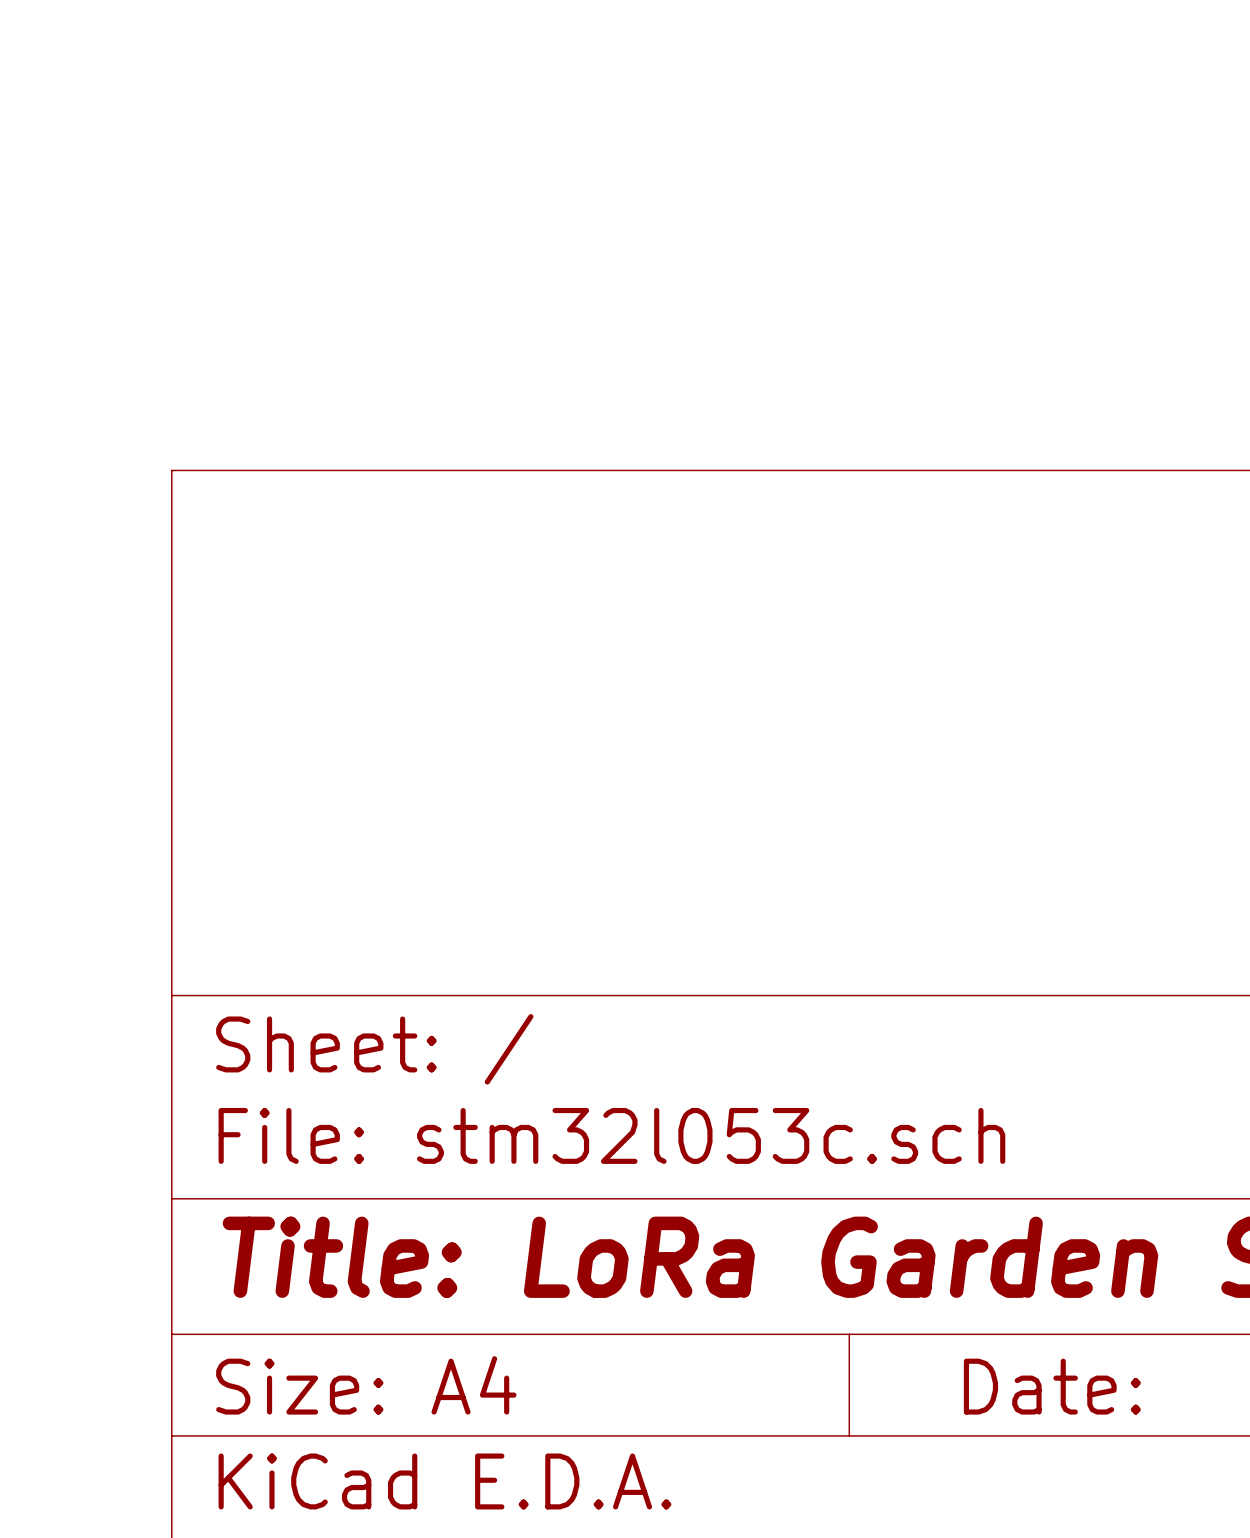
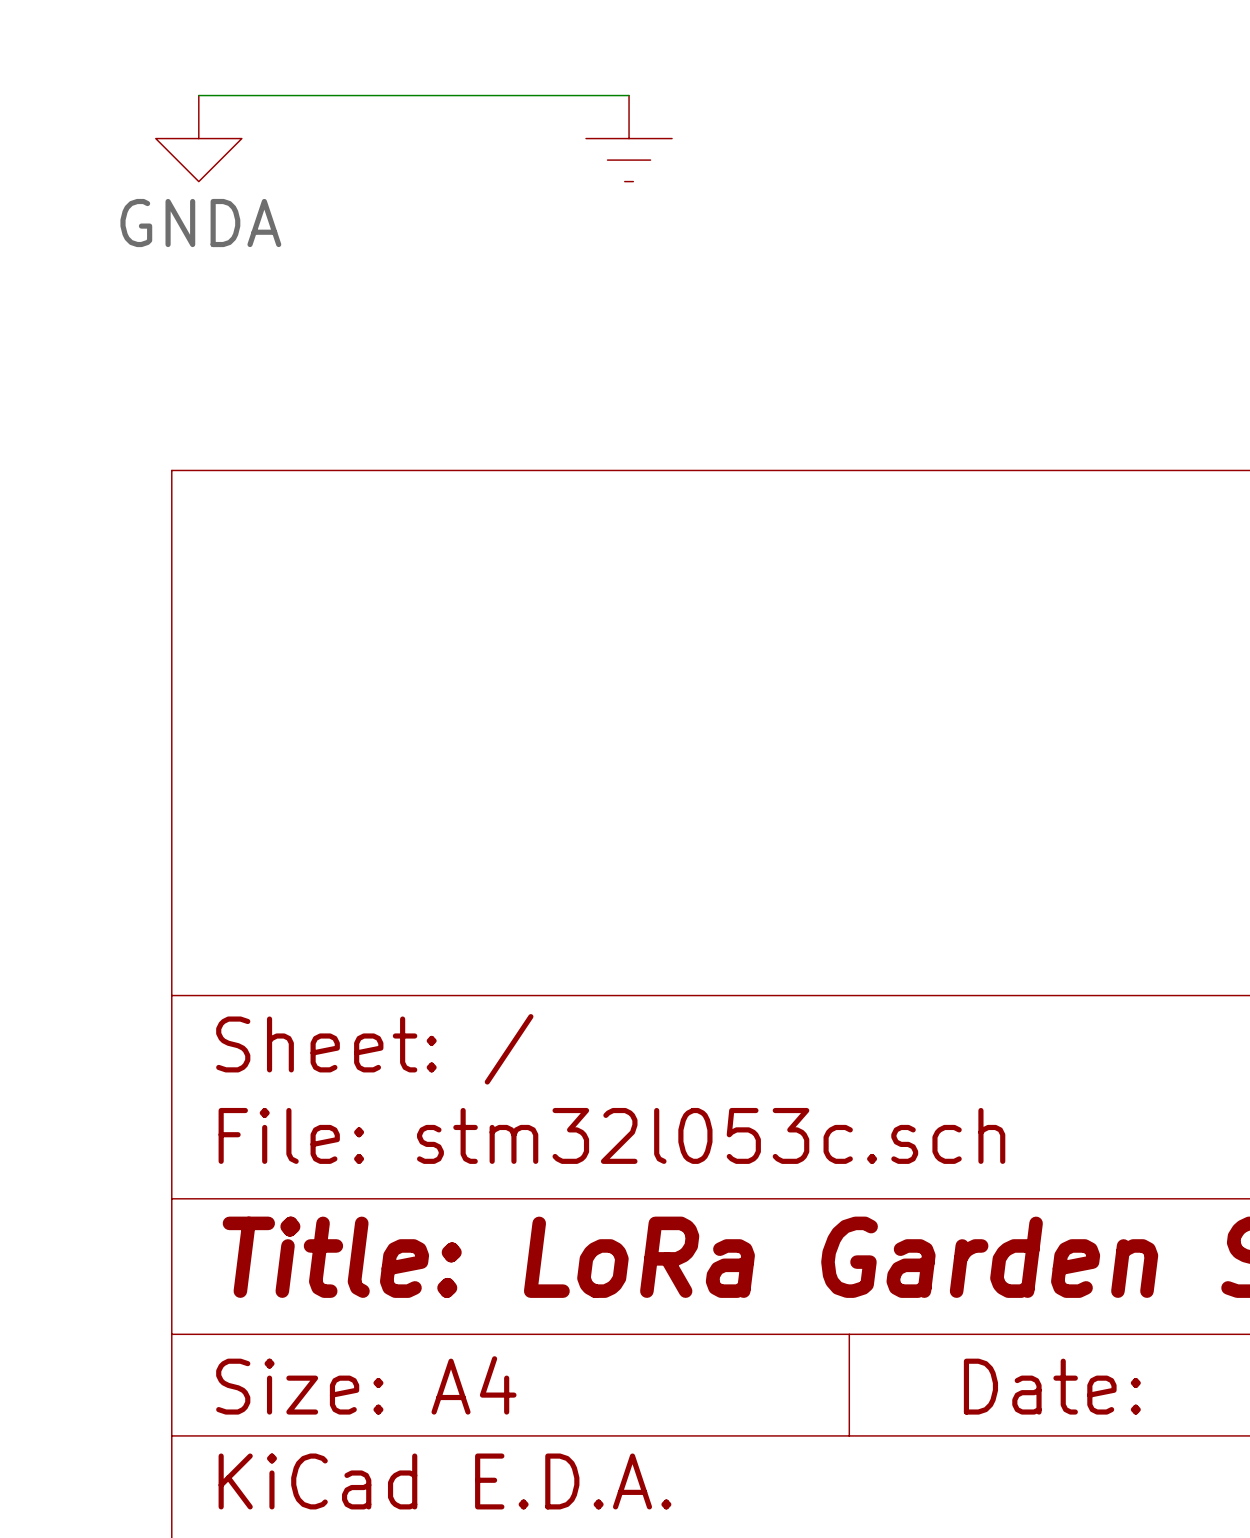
wire: none -> (198, 95) (629, 95)
power symbol: none -> GNDA (198, 138)
power symbol: none -> (629, 138)

